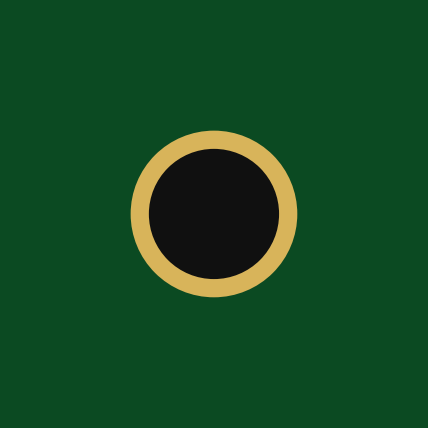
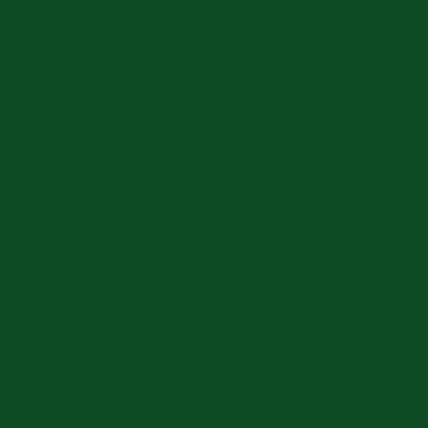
part: (213, 213) -> none

